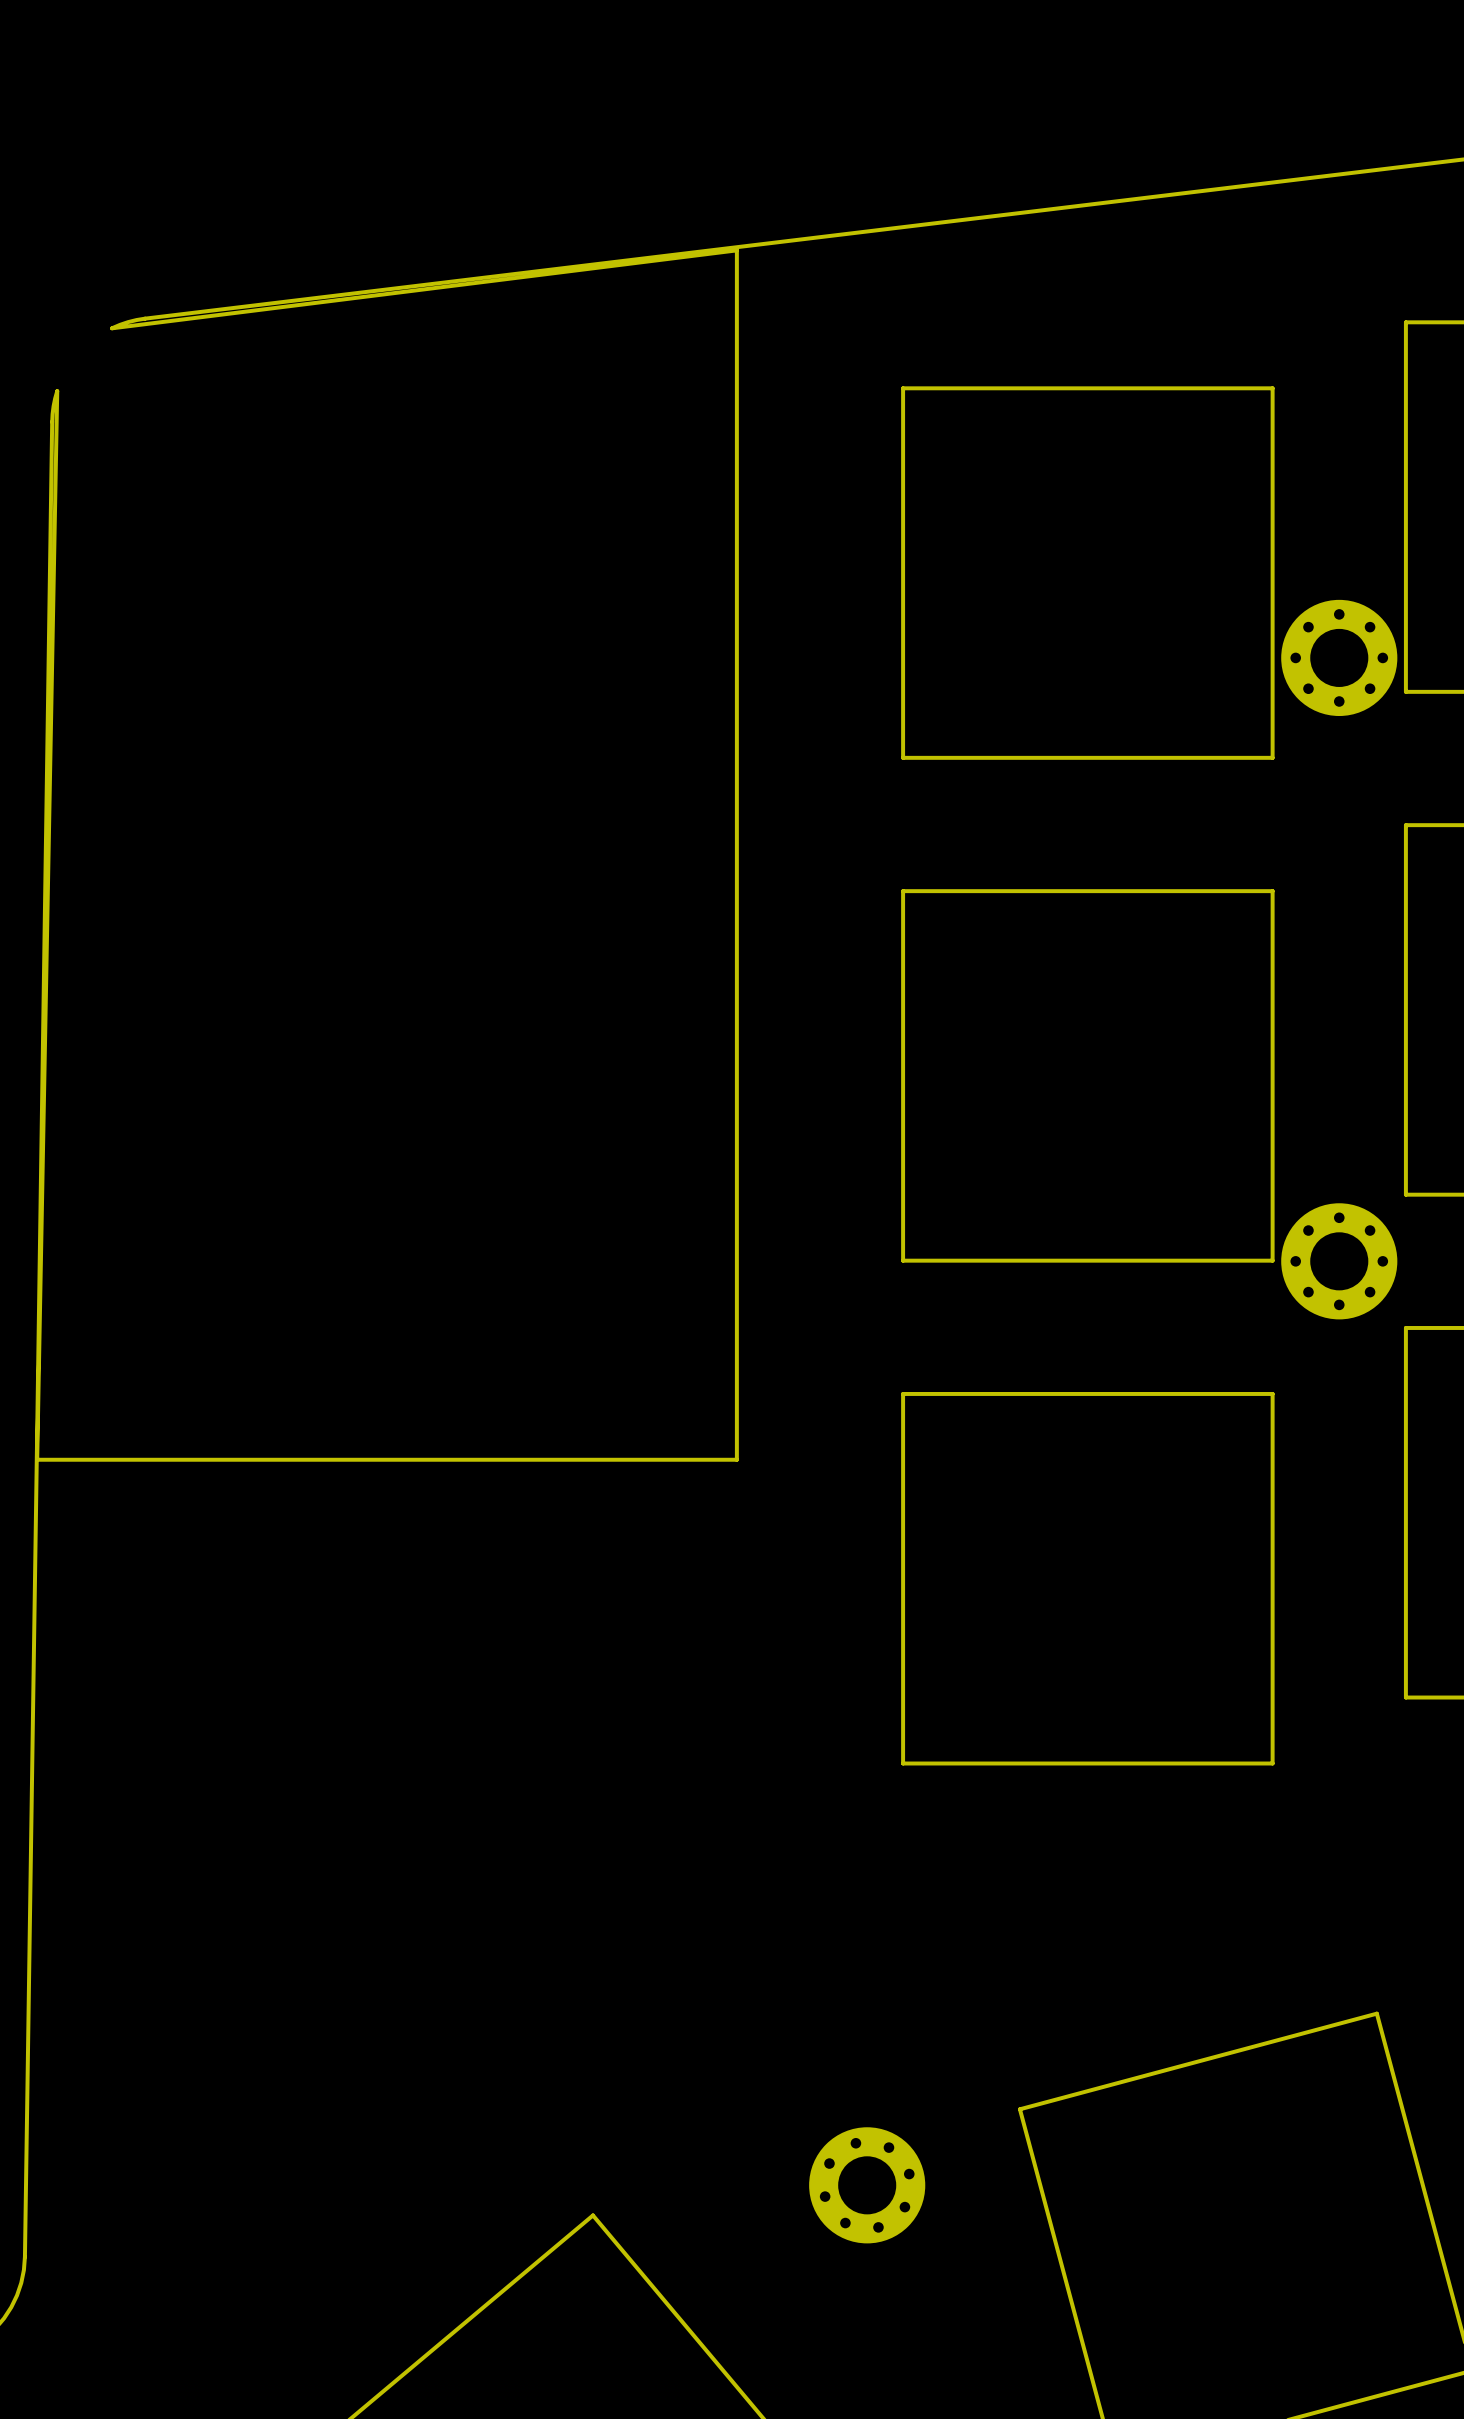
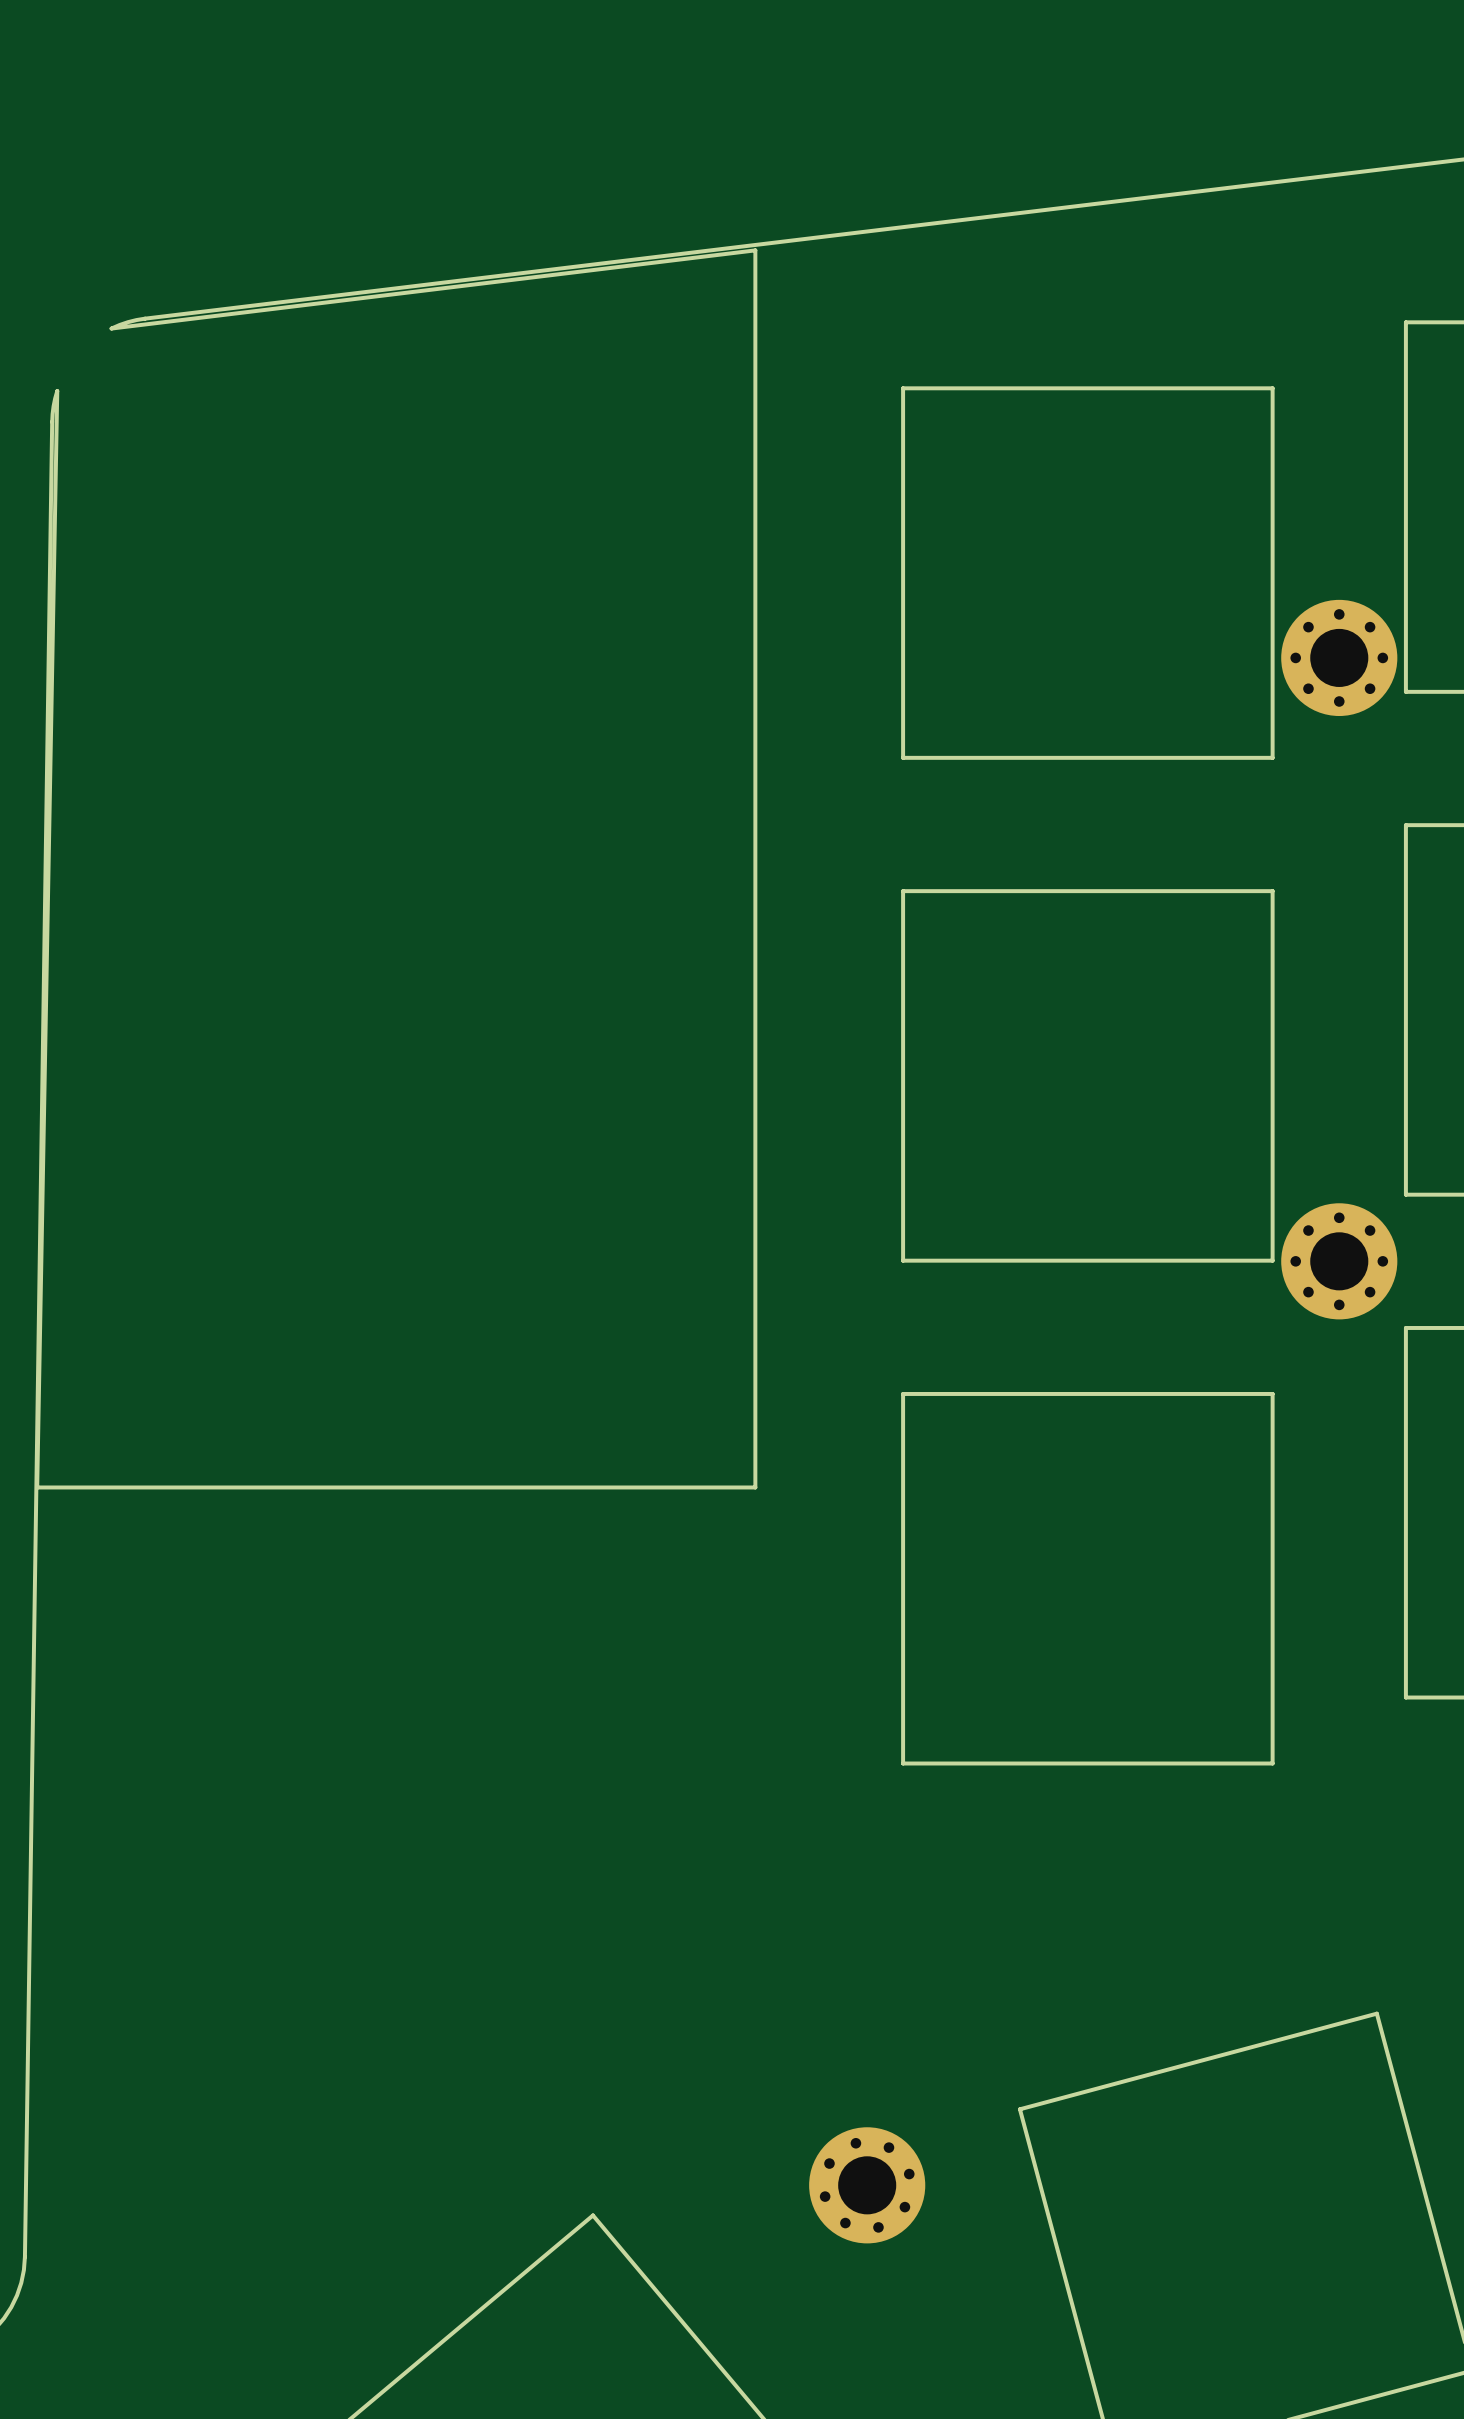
board edge: (145, 318) (112, 328) (736, 250) (736, 1459) (37, 1459) (57, 391) (52, 421) -> (145, 318) (111, 328) (755, 250) (755, 1487) (37, 1487) (57, 391) (52, 421)

